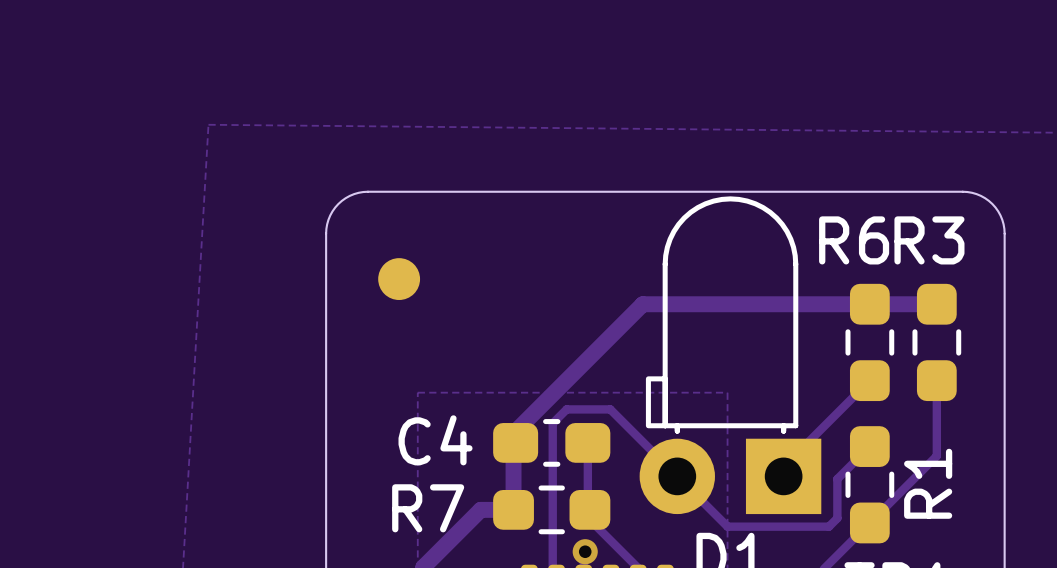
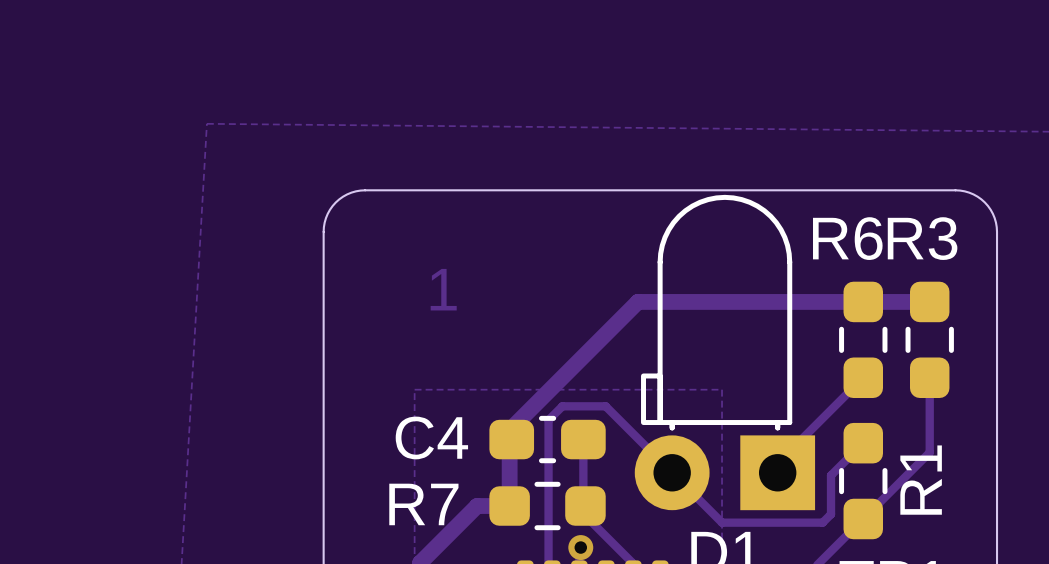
drawing: none -> [430, 268, 457, 311]
part: (399, 279) -> none

